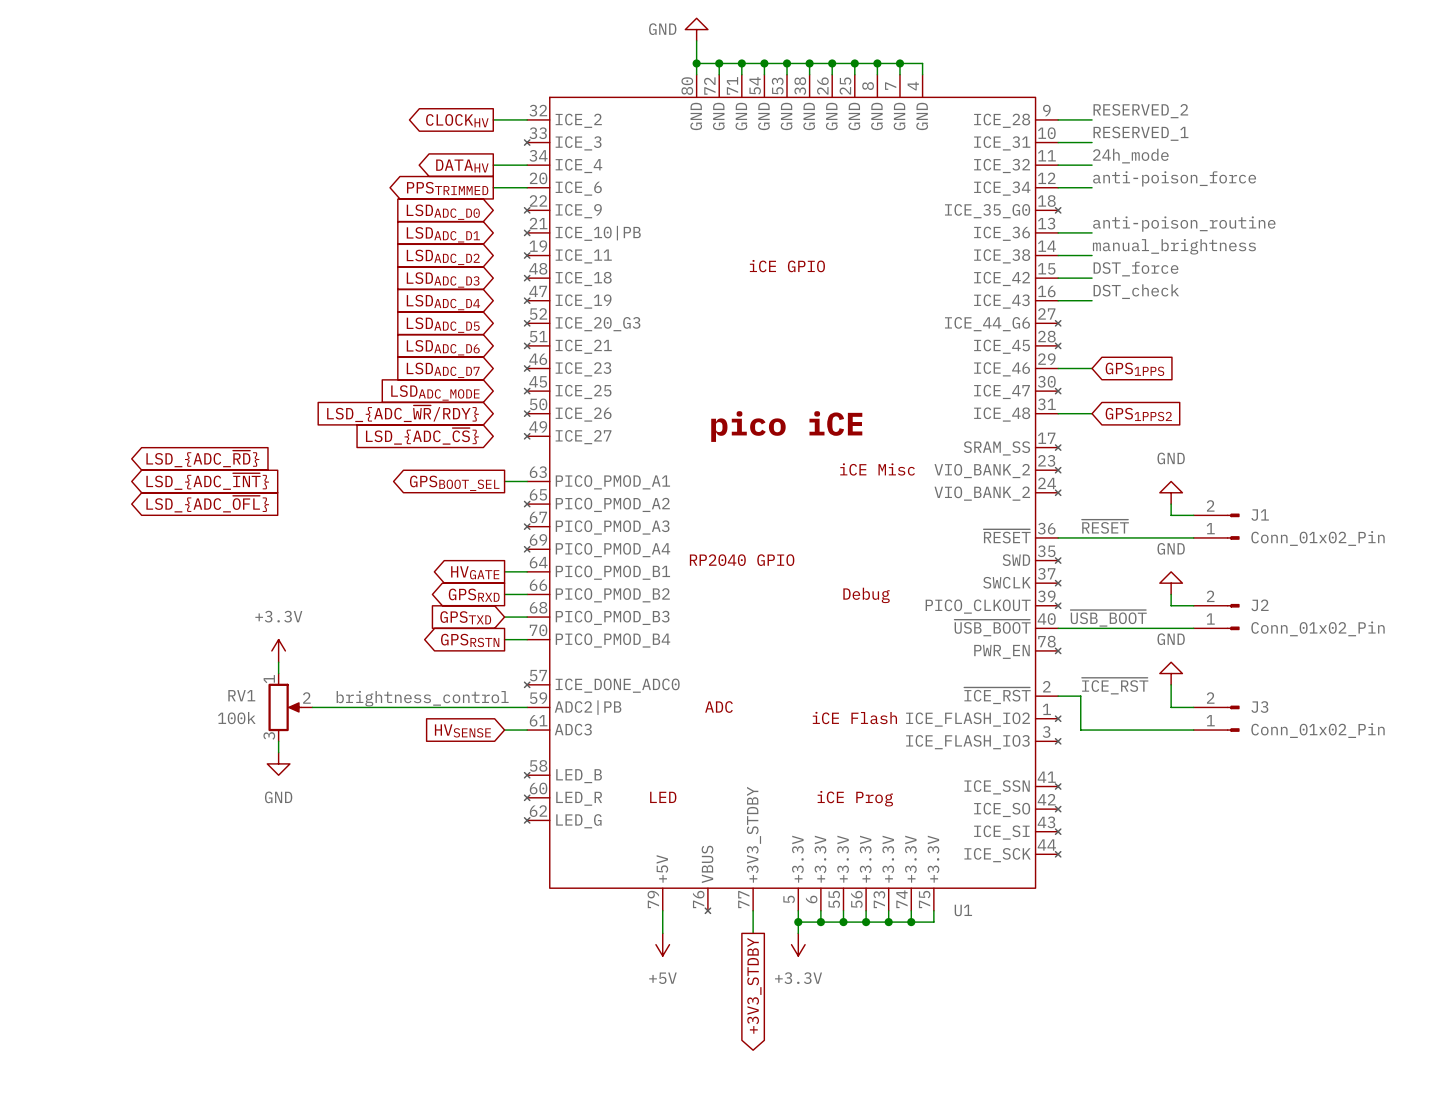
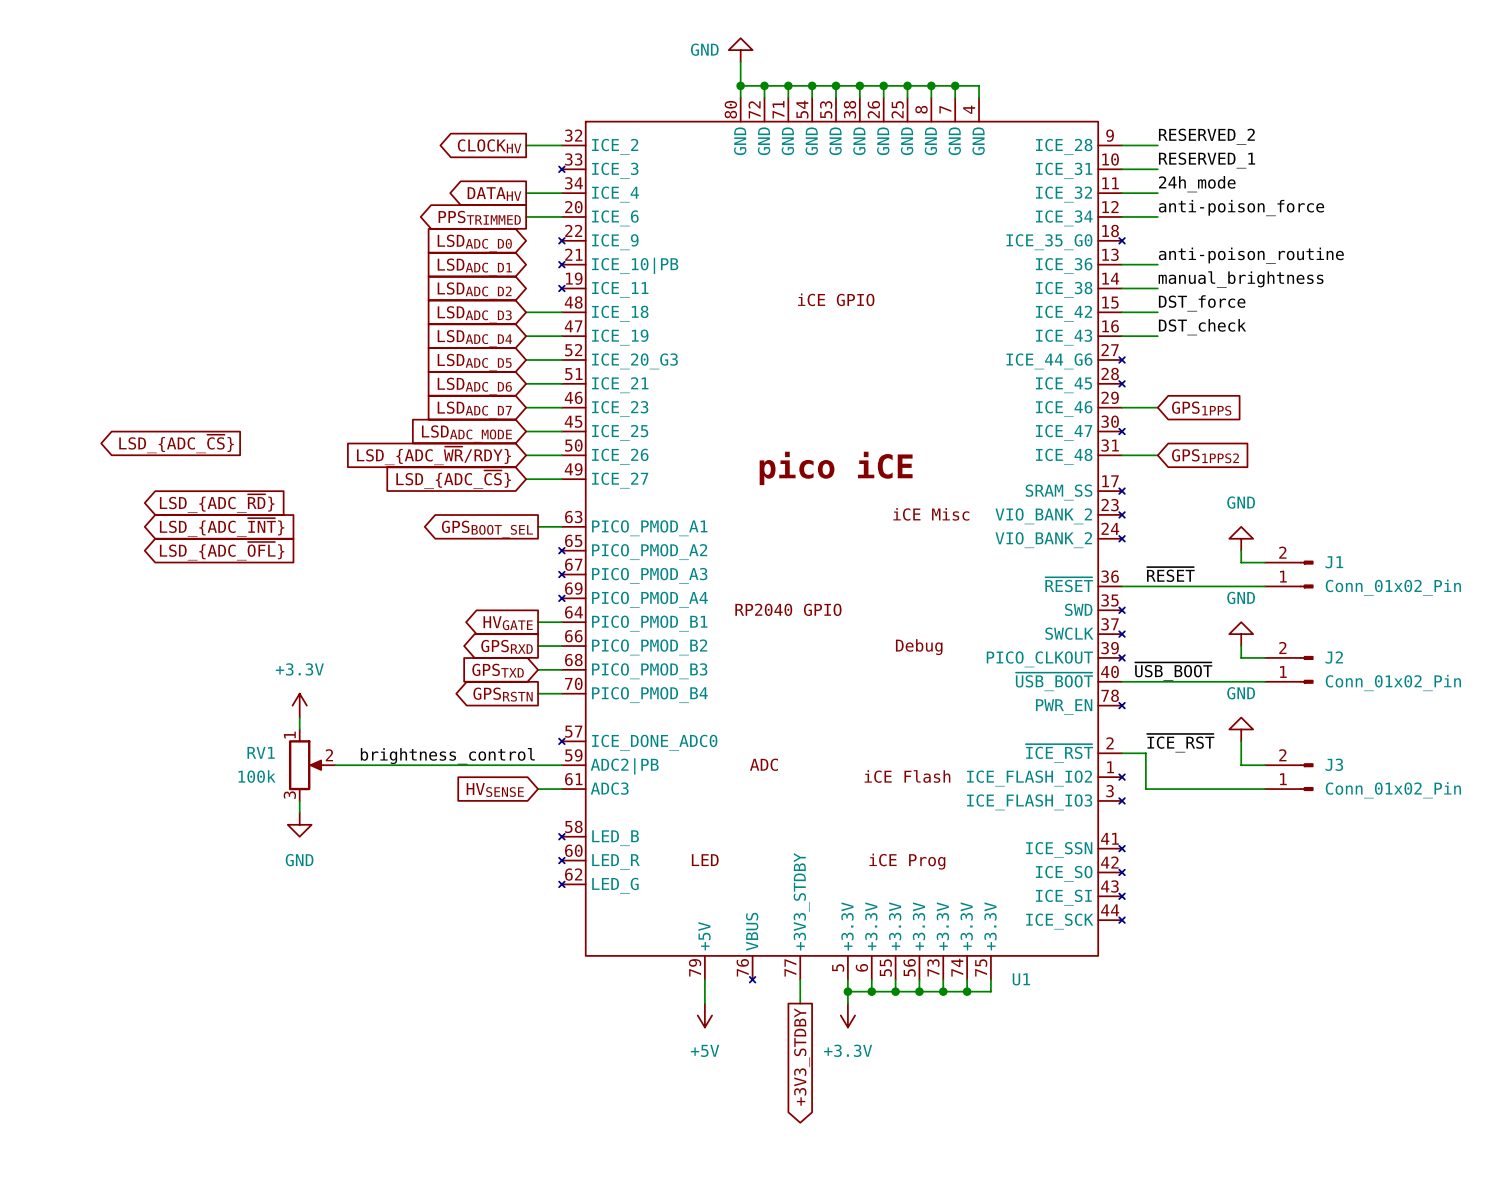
U1 symbol: [524, 74, 1061, 914] -> [559, 97, 1125, 983]
wire: none -> (526, 312) (561, 312)
wire: none -> (526, 336) (561, 336)
wire: none -> (526, 360) (561, 360)
wire: none -> (526, 383) (561, 383)
wire: none -> (526, 407) (561, 407)
wire: none -> (526, 431) (561, 431)
global label: none -> LSD_{ADC_~{CS}} (176, 443)
wire: none -> (526, 455) (561, 455)
wire: none -> (526, 479) (561, 479)

